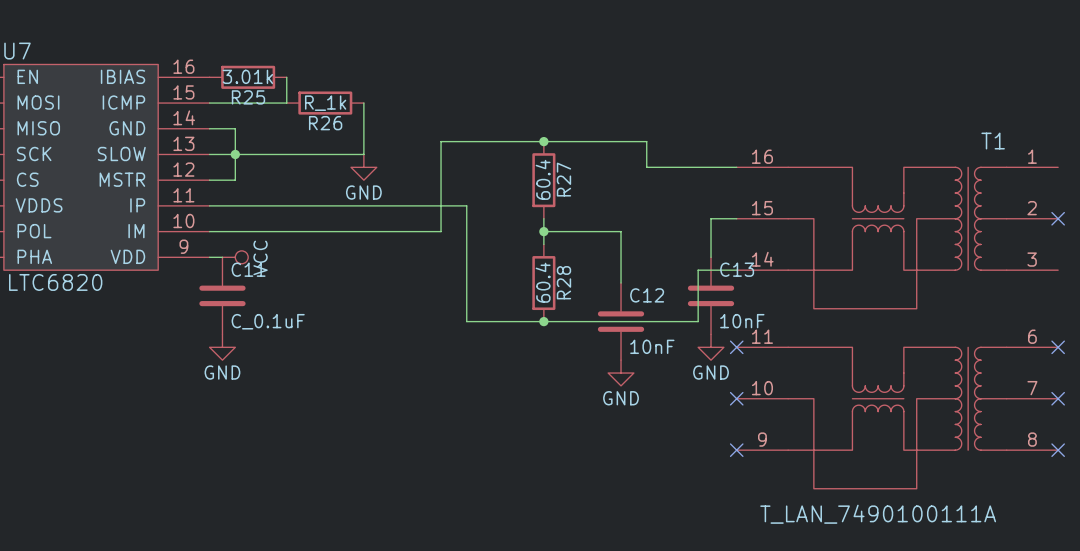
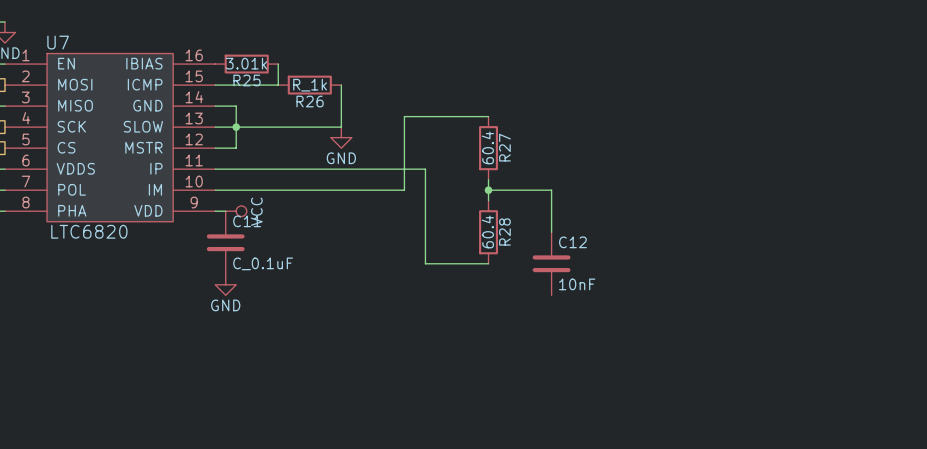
wire: (543, 141) (646, 141) (646, 167) (736, 167) -> none
junction: (543, 141) -> none
wire: (736, 218) (711, 218) (711, 257) -> none
no-connect mark: (1058, 218) -> none
wire: (736, 270) (698, 270) (698, 321) (543, 321) -> none
C13: 10nF (711, 295) -> none
junction: (543, 321) -> none
T1: T_LAN_7490100111A (897, 328) -> none
power symbol: GND (711, 347) -> none
no-connect mark: (736, 347) -> none
no-connect mark: (1058, 347) -> none
power symbol: GND (621, 373) -> none
no-connect mark: (736, 398) -> none
no-connect mark: (1058, 398) -> none
no-connect mark: (736, 450) -> none
no-connect mark: (1058, 450) -> none

